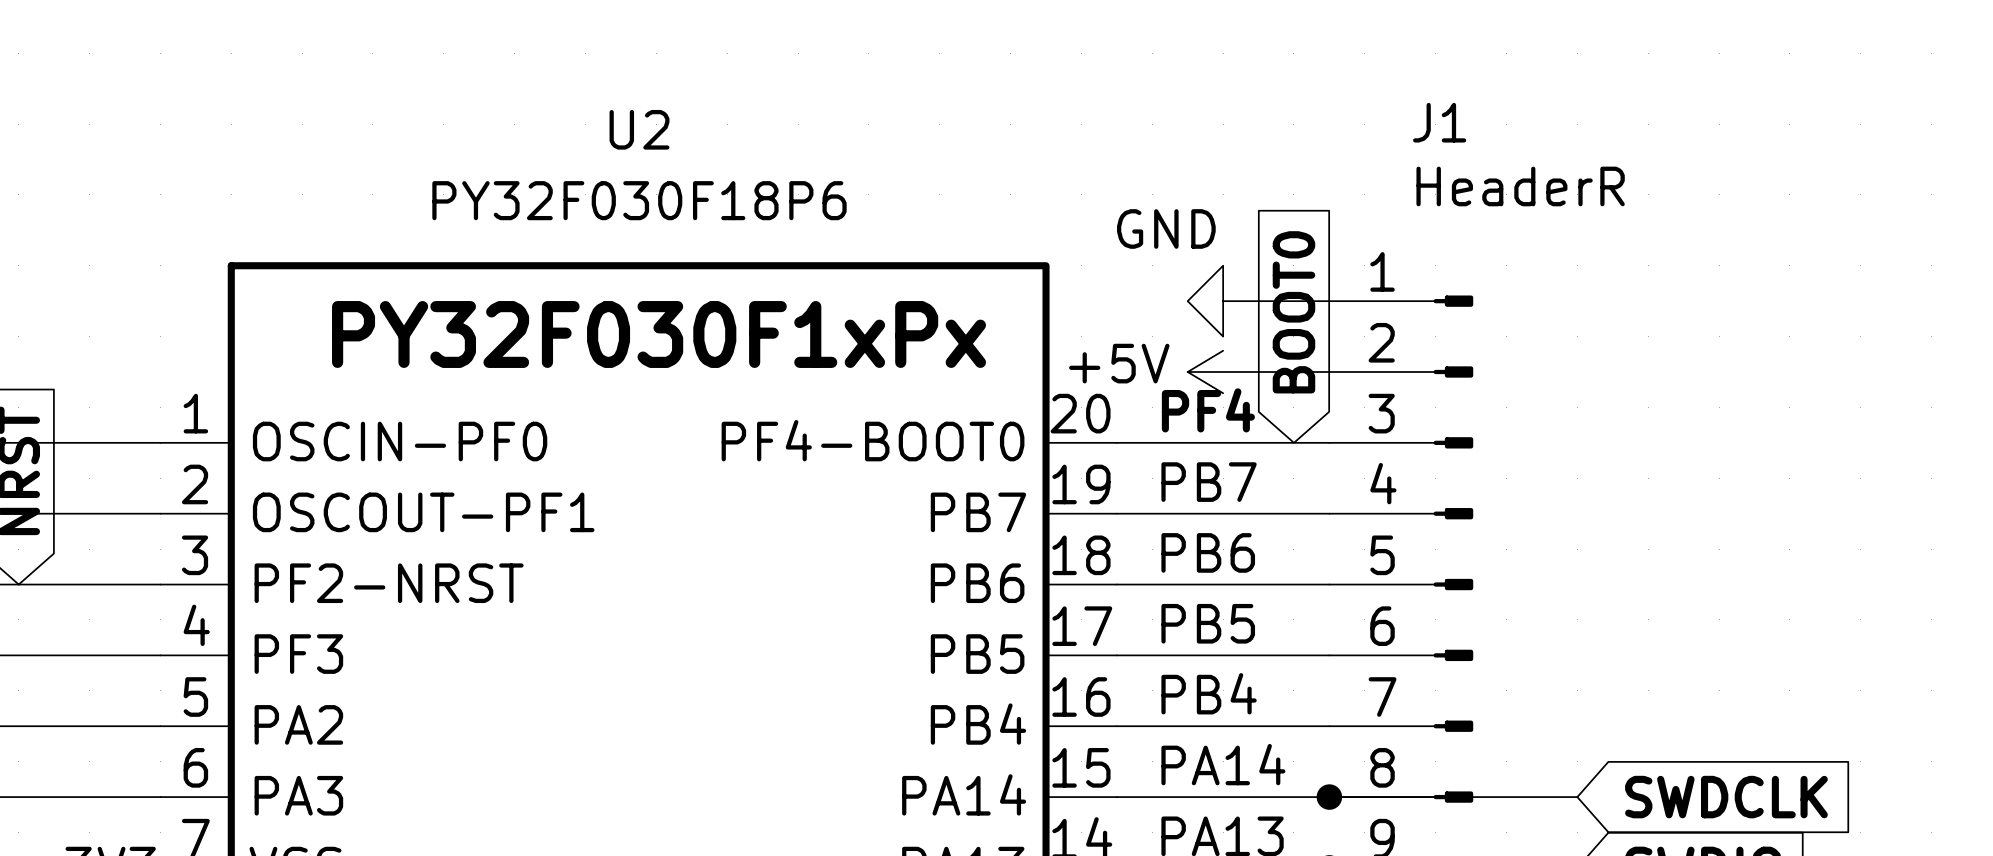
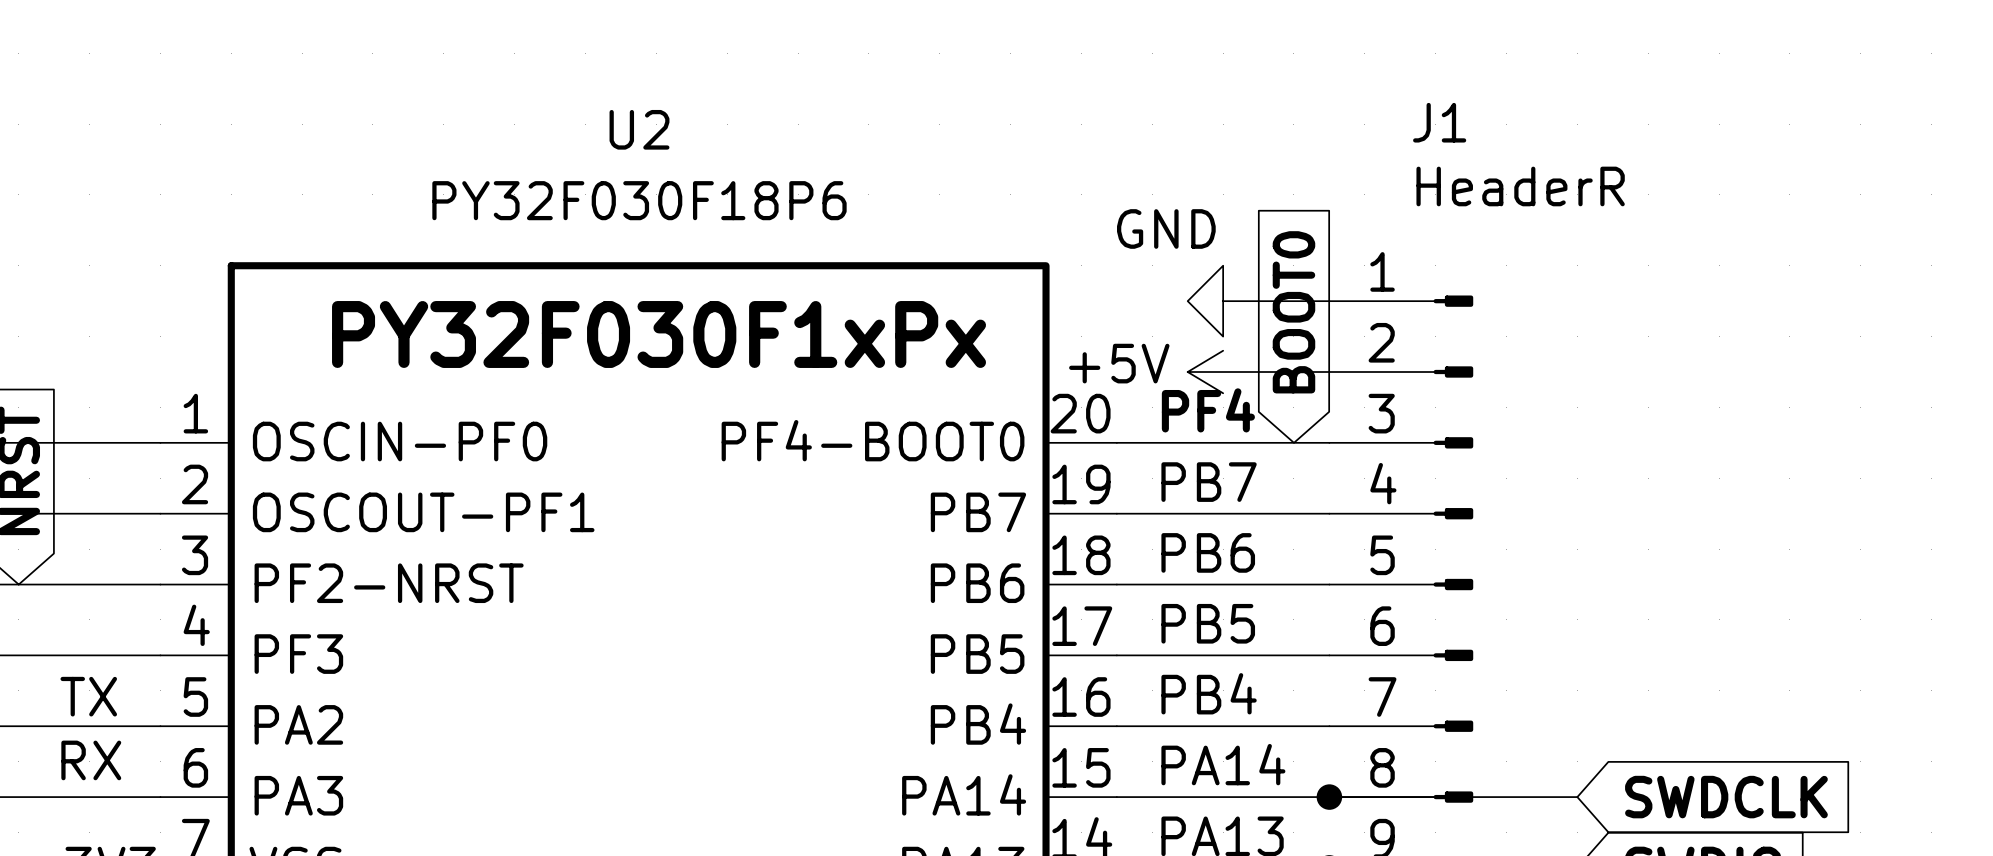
text: none -> TX (88, 696)
text: none -> RX (91, 760)

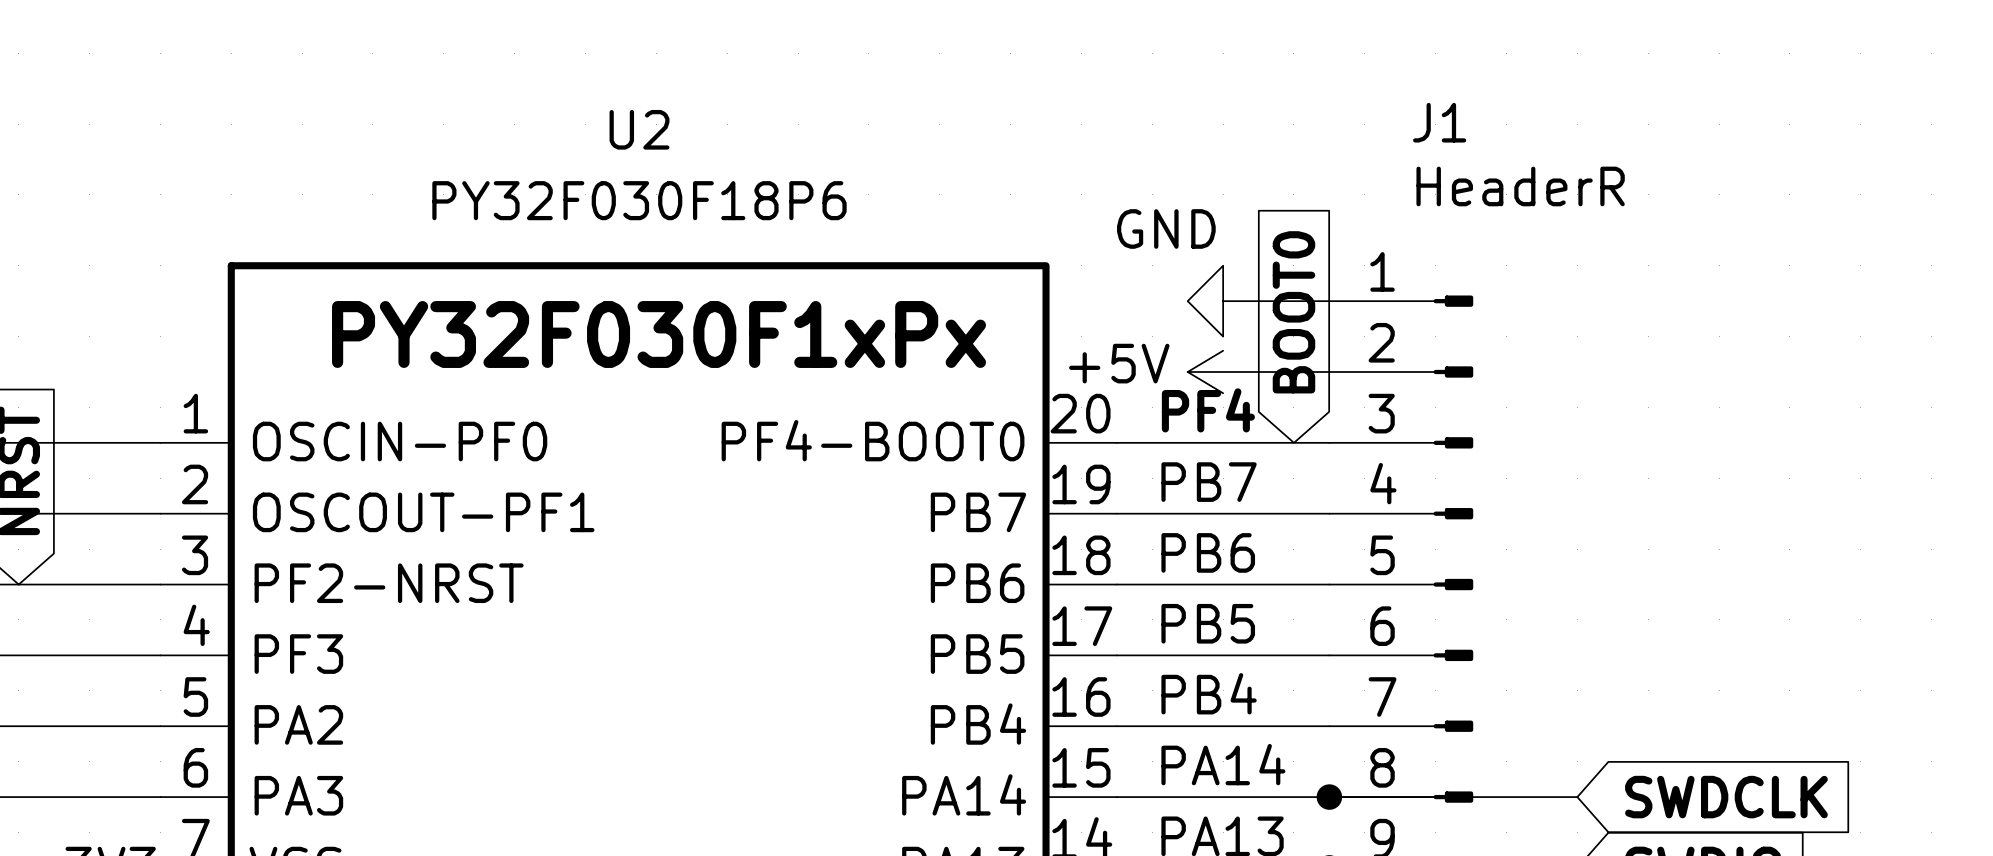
text: TX (88, 696) -> none
text: RX (91, 760) -> none

